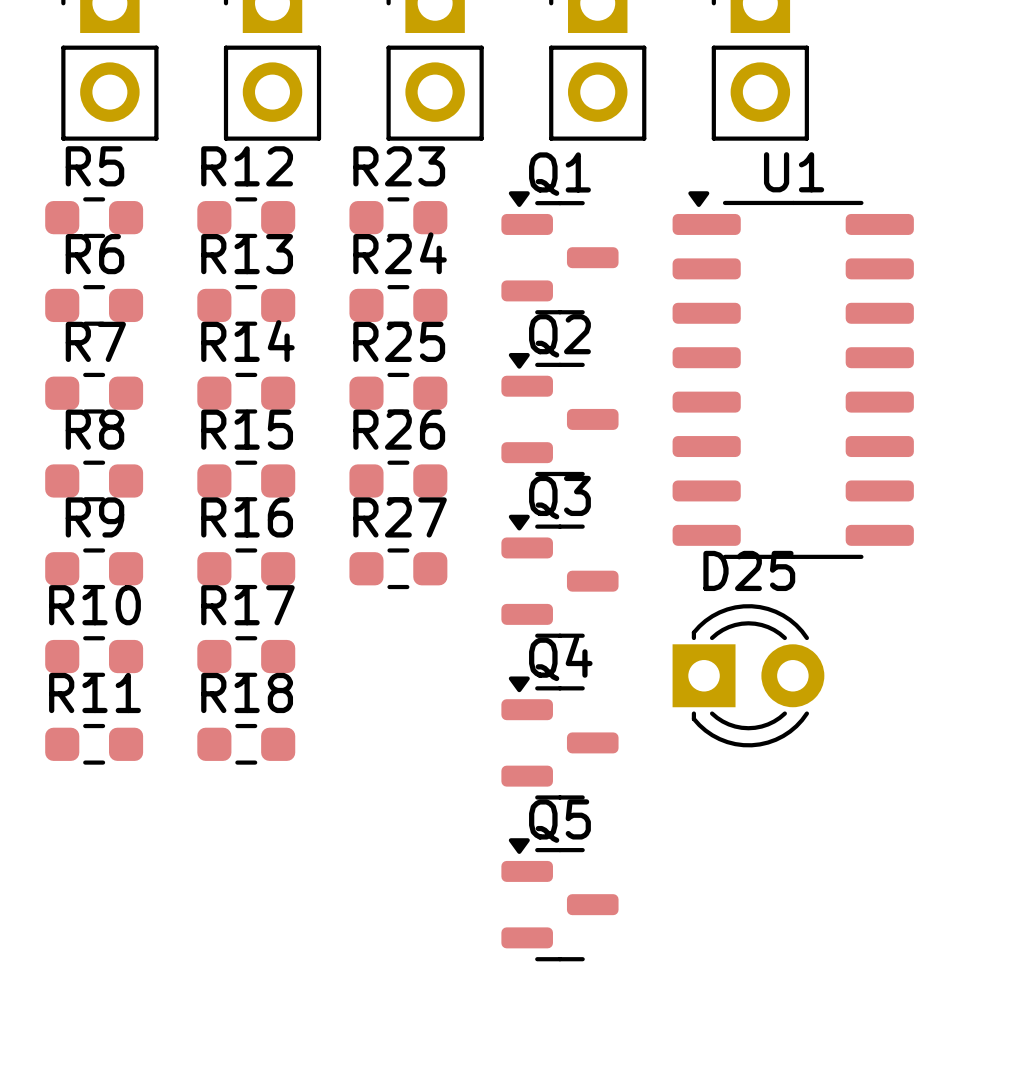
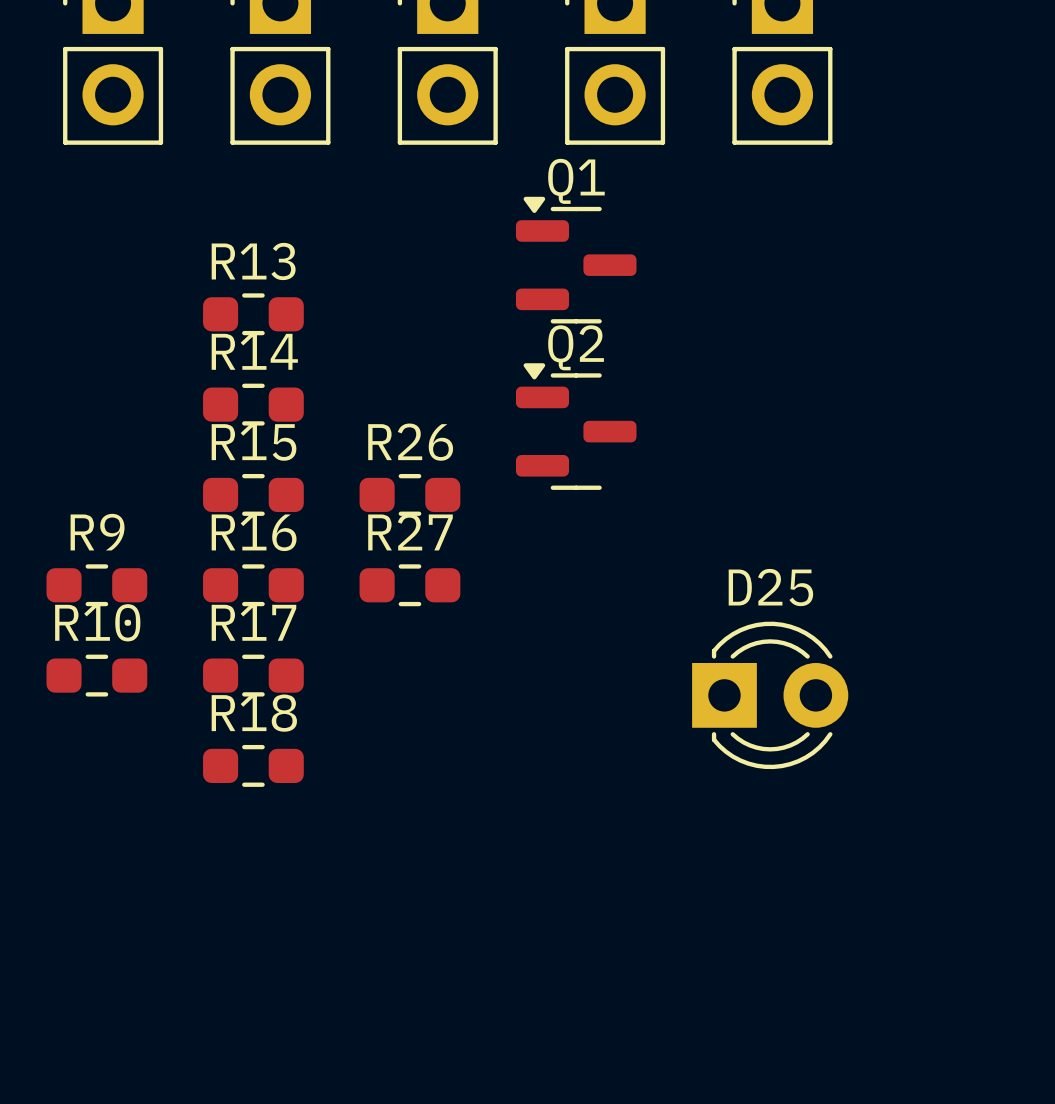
R5: (94, 217) -> none
R12: (246, 217) -> none
R23: (398, 217) -> none
R6: (94, 305) -> none
R24: (398, 305) -> none
U1: (793, 375) -> none
R7: (94, 393) -> none
R25: (398, 393) -> none
R8: (94, 480) -> none
Q3: (559, 576) -> none
Q4: (559, 738) -> none
R11: (94, 744) -> none
Q5: (559, 899) -> none

